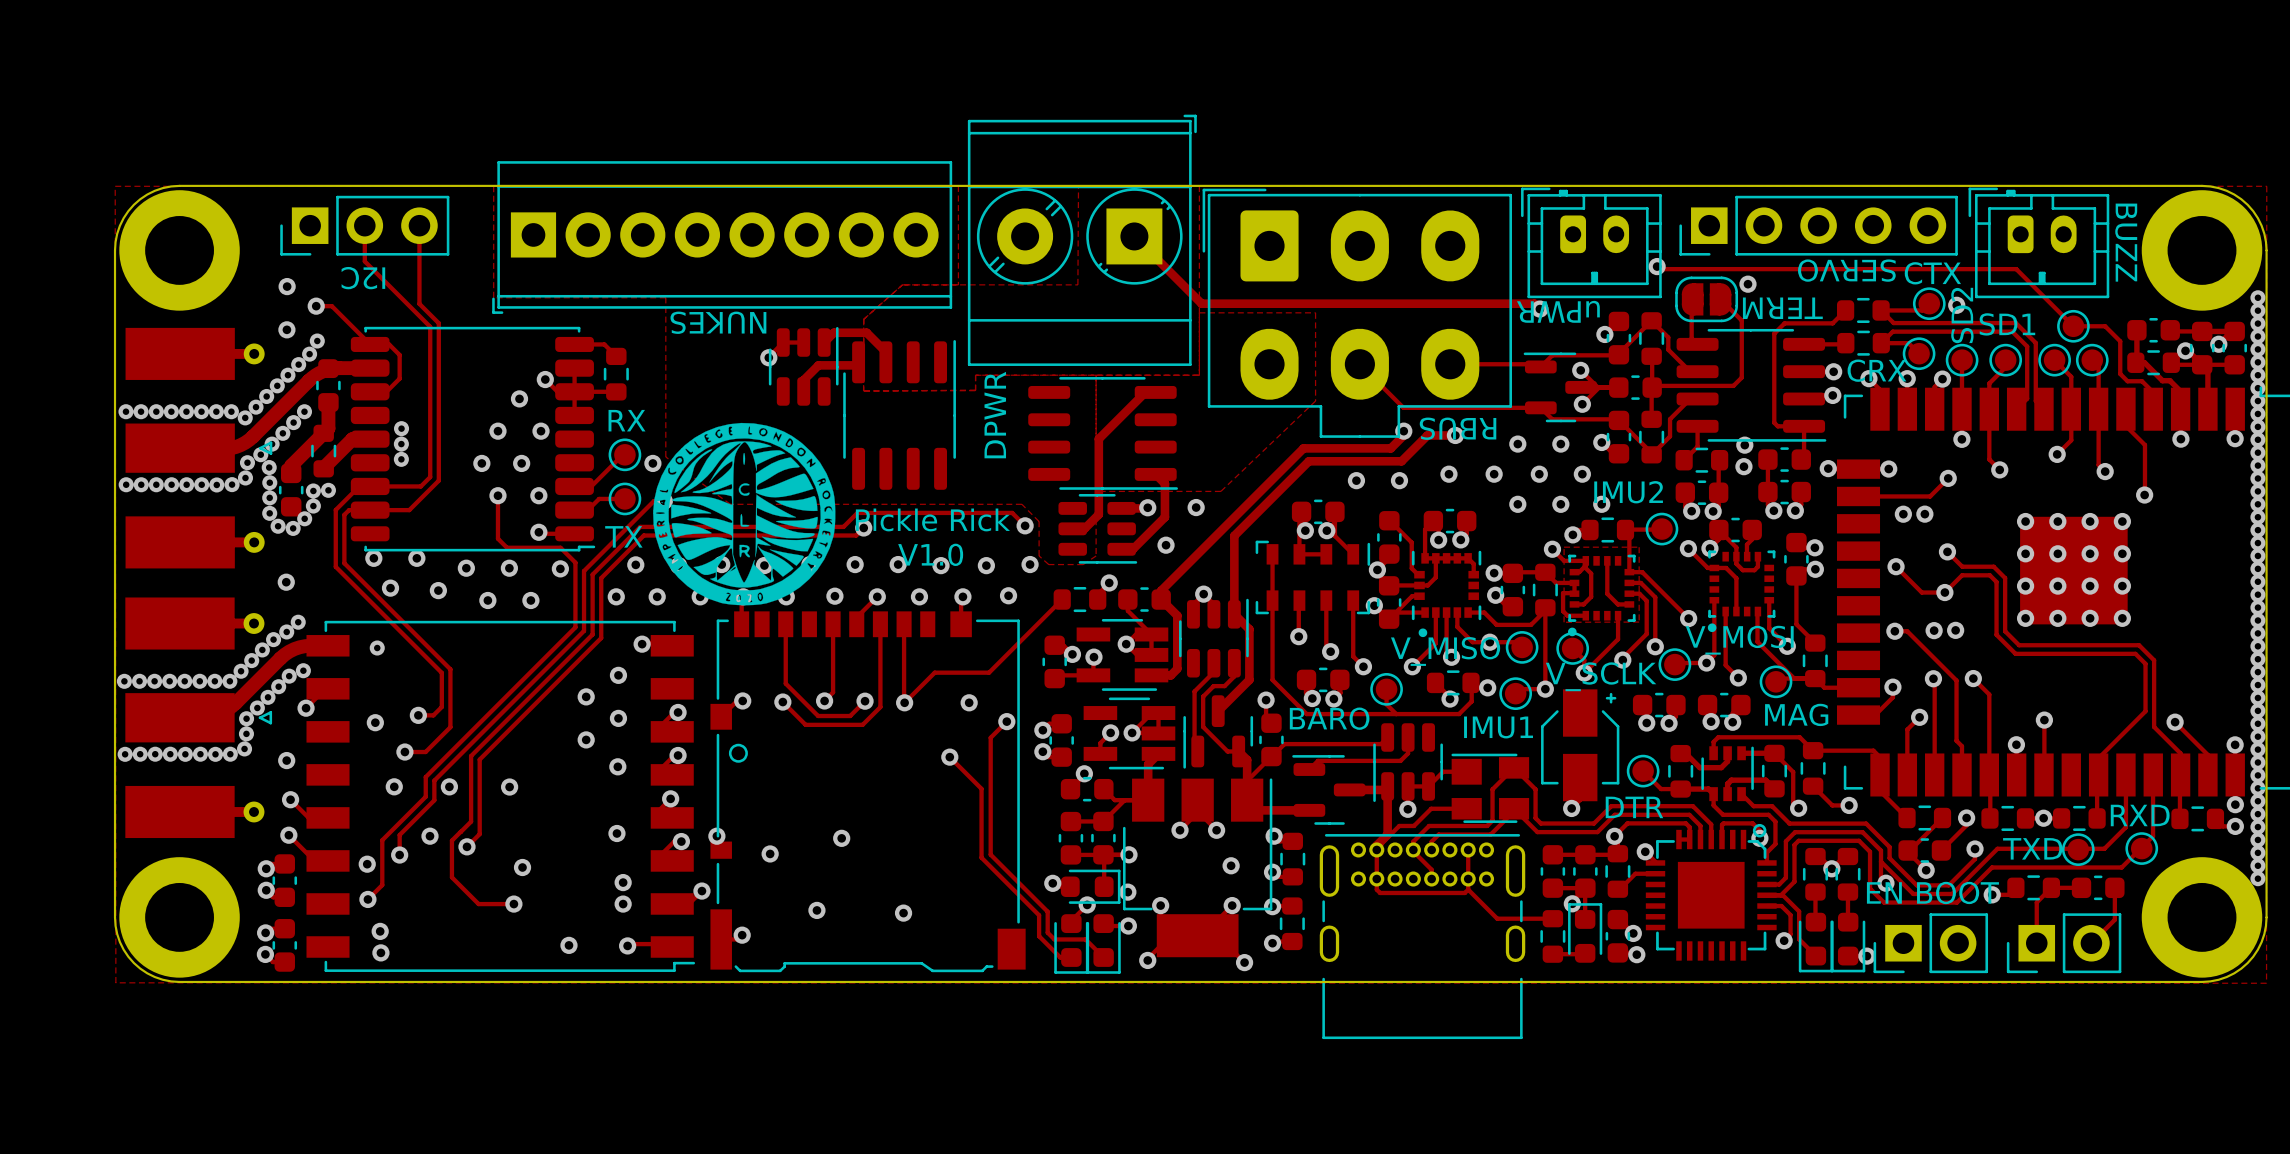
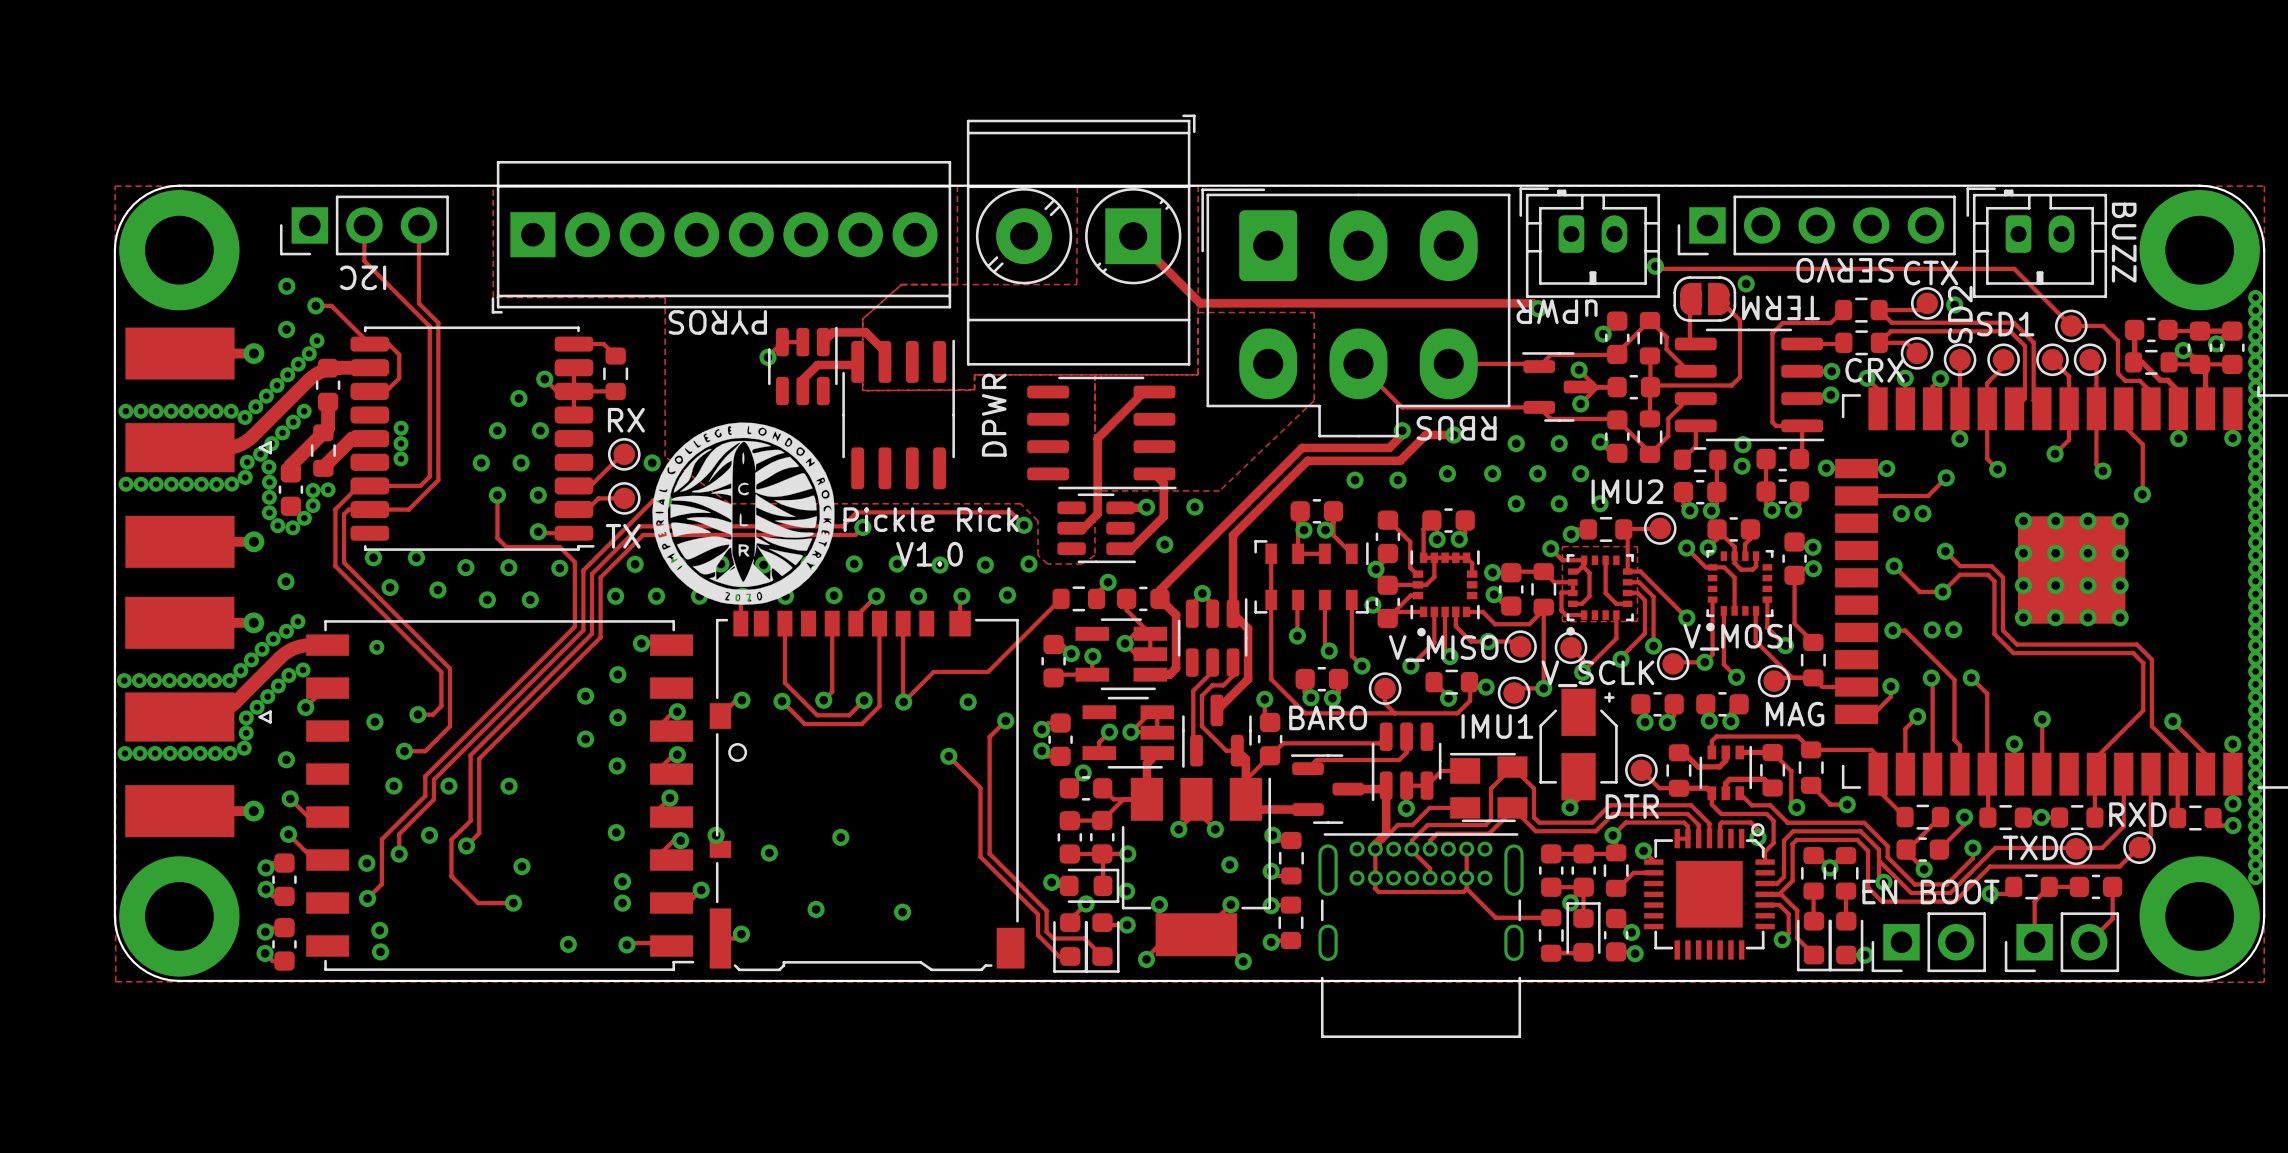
text: NUKES (718, 322) -> PYROS (717, 322)

